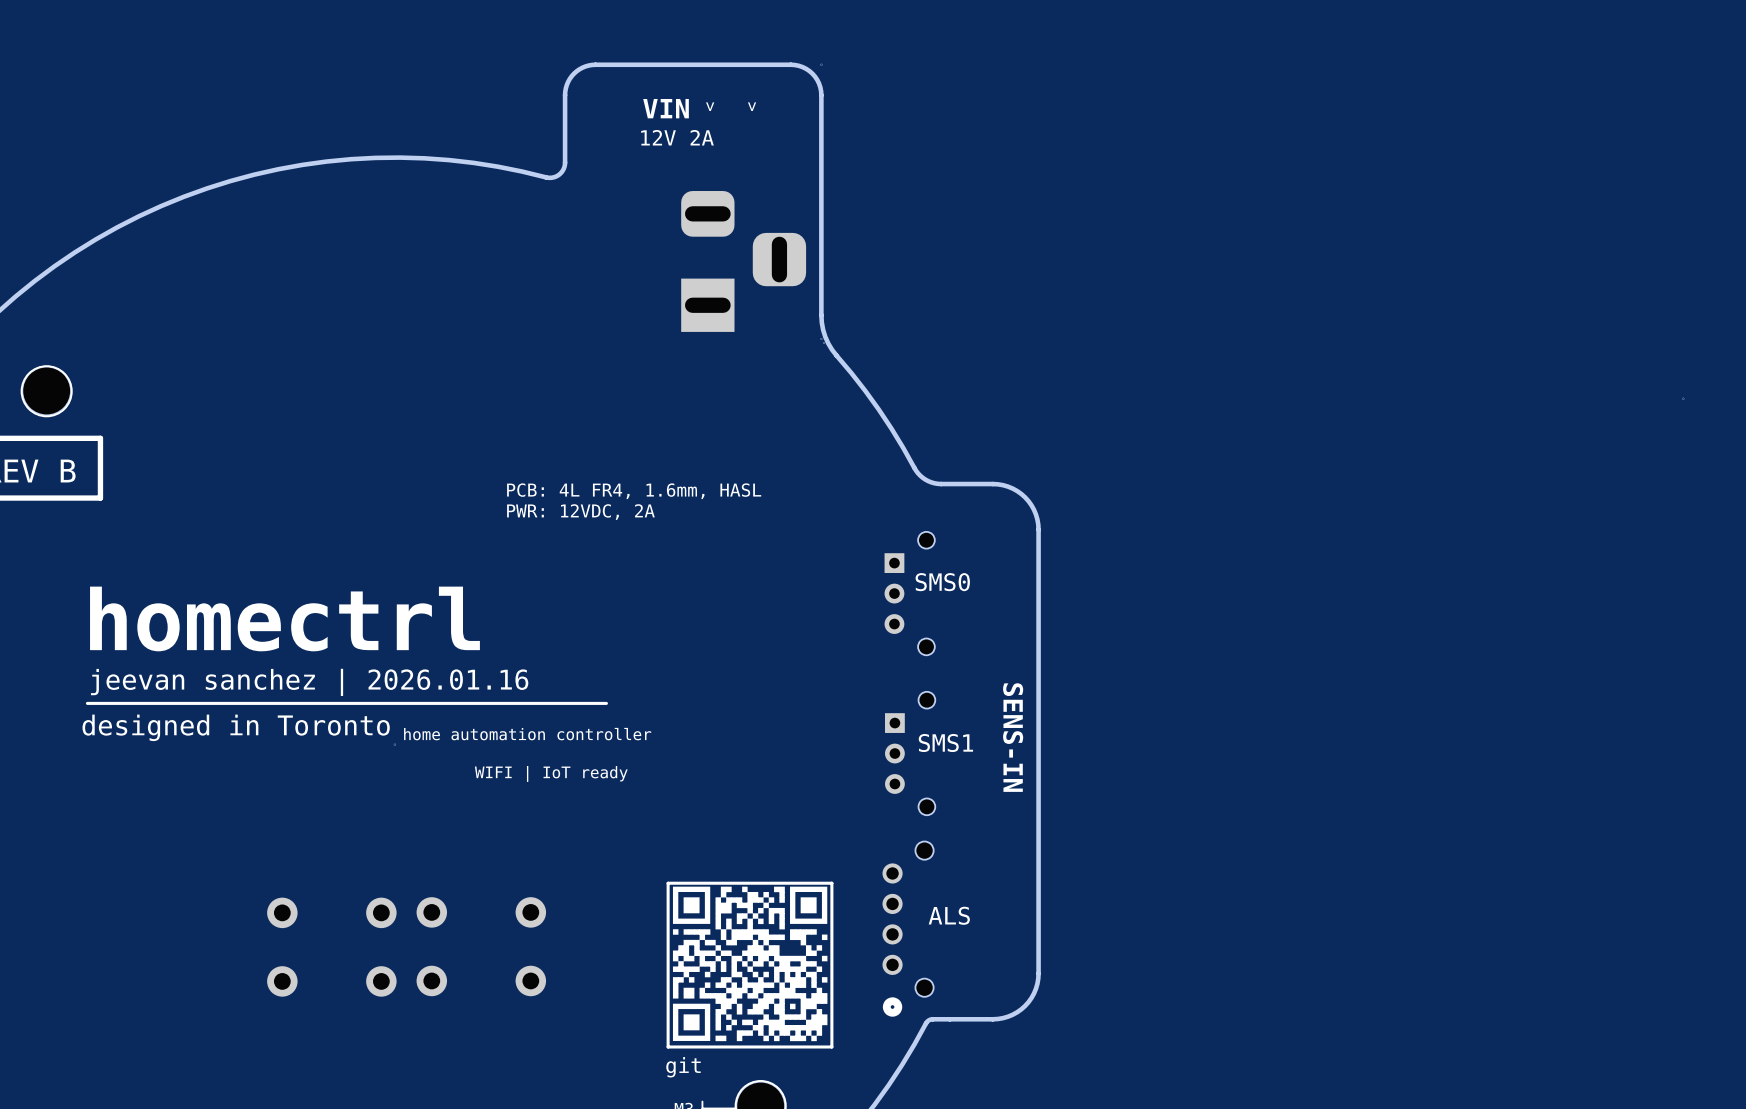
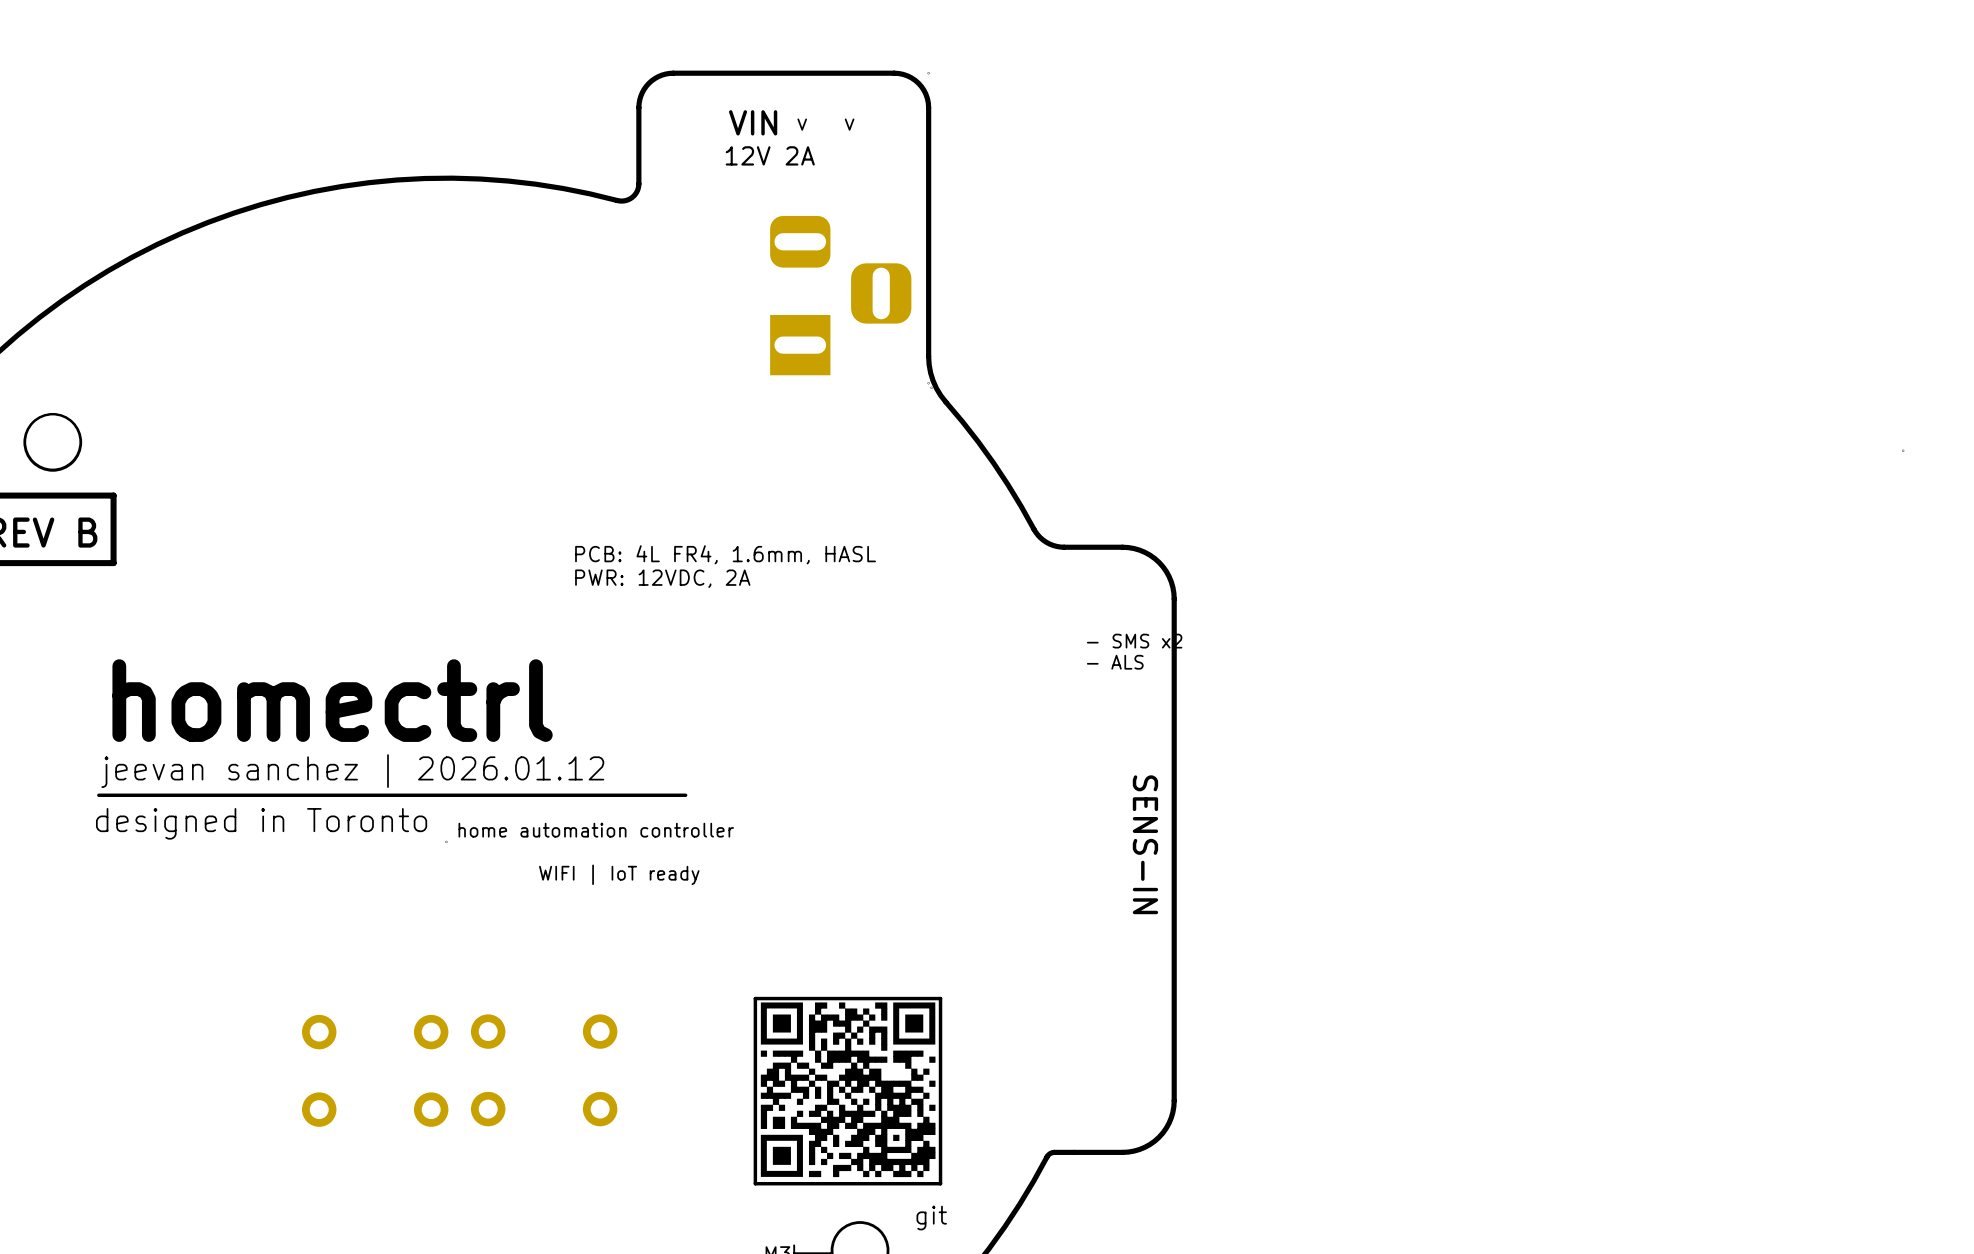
text: none -> - SMS x2 (1134, 641)
text: SMS0 (942, 582) -> none
text: none -> - ALS (1115, 662)
part: (909, 593) -> none
text: jeevan sanchez | 2026.01.16 (309, 682) -> jeevan sanchez | 2026.01.12 (352, 771)
text: SMS1 (945, 743) -> none
part: (910, 753) -> none
text: ALS (949, 915) -> none
part: (908, 929) -> none
text position: git (683, 1067) -> git (931, 1218)

